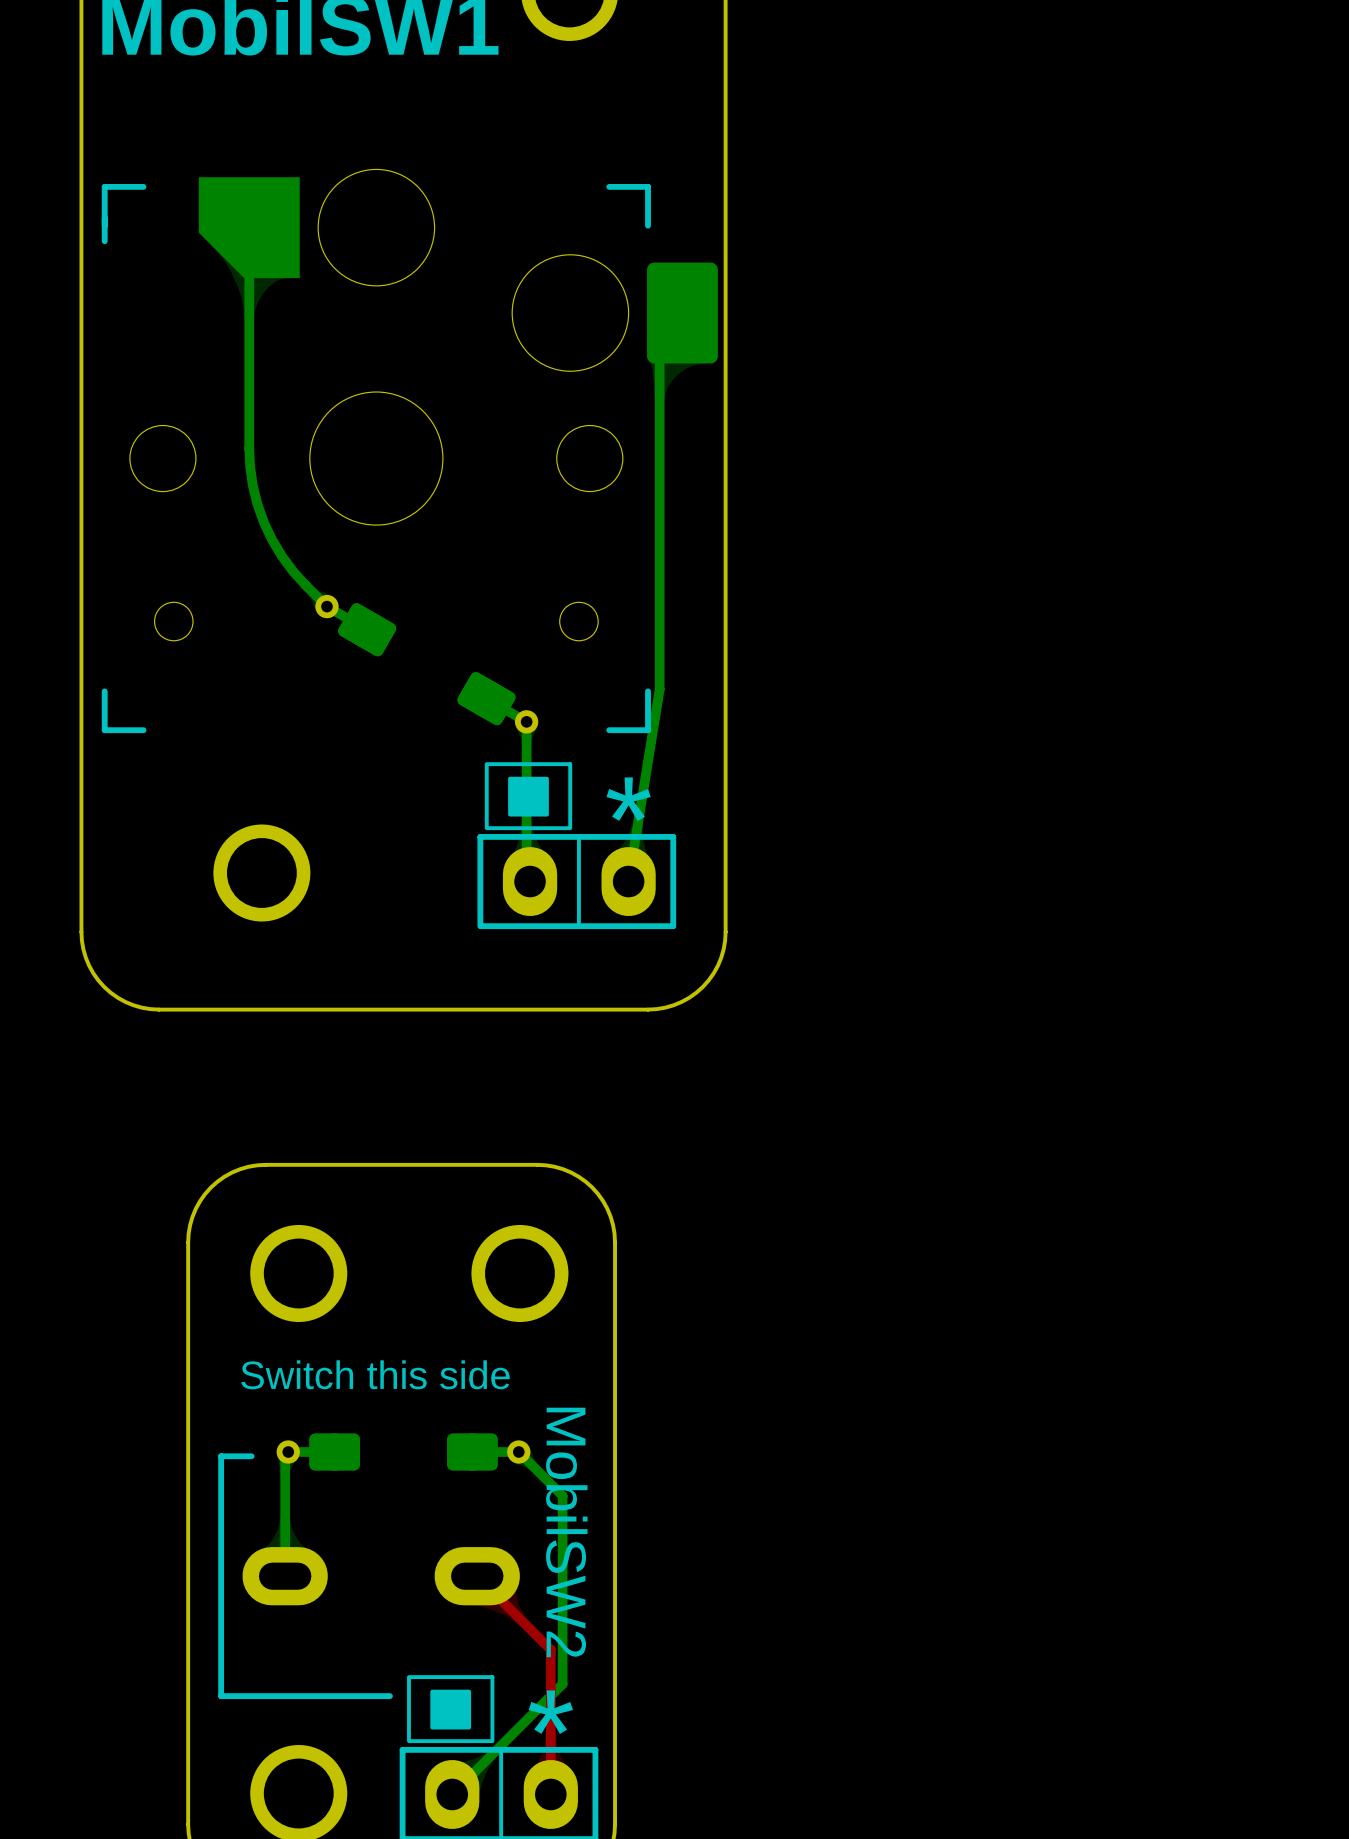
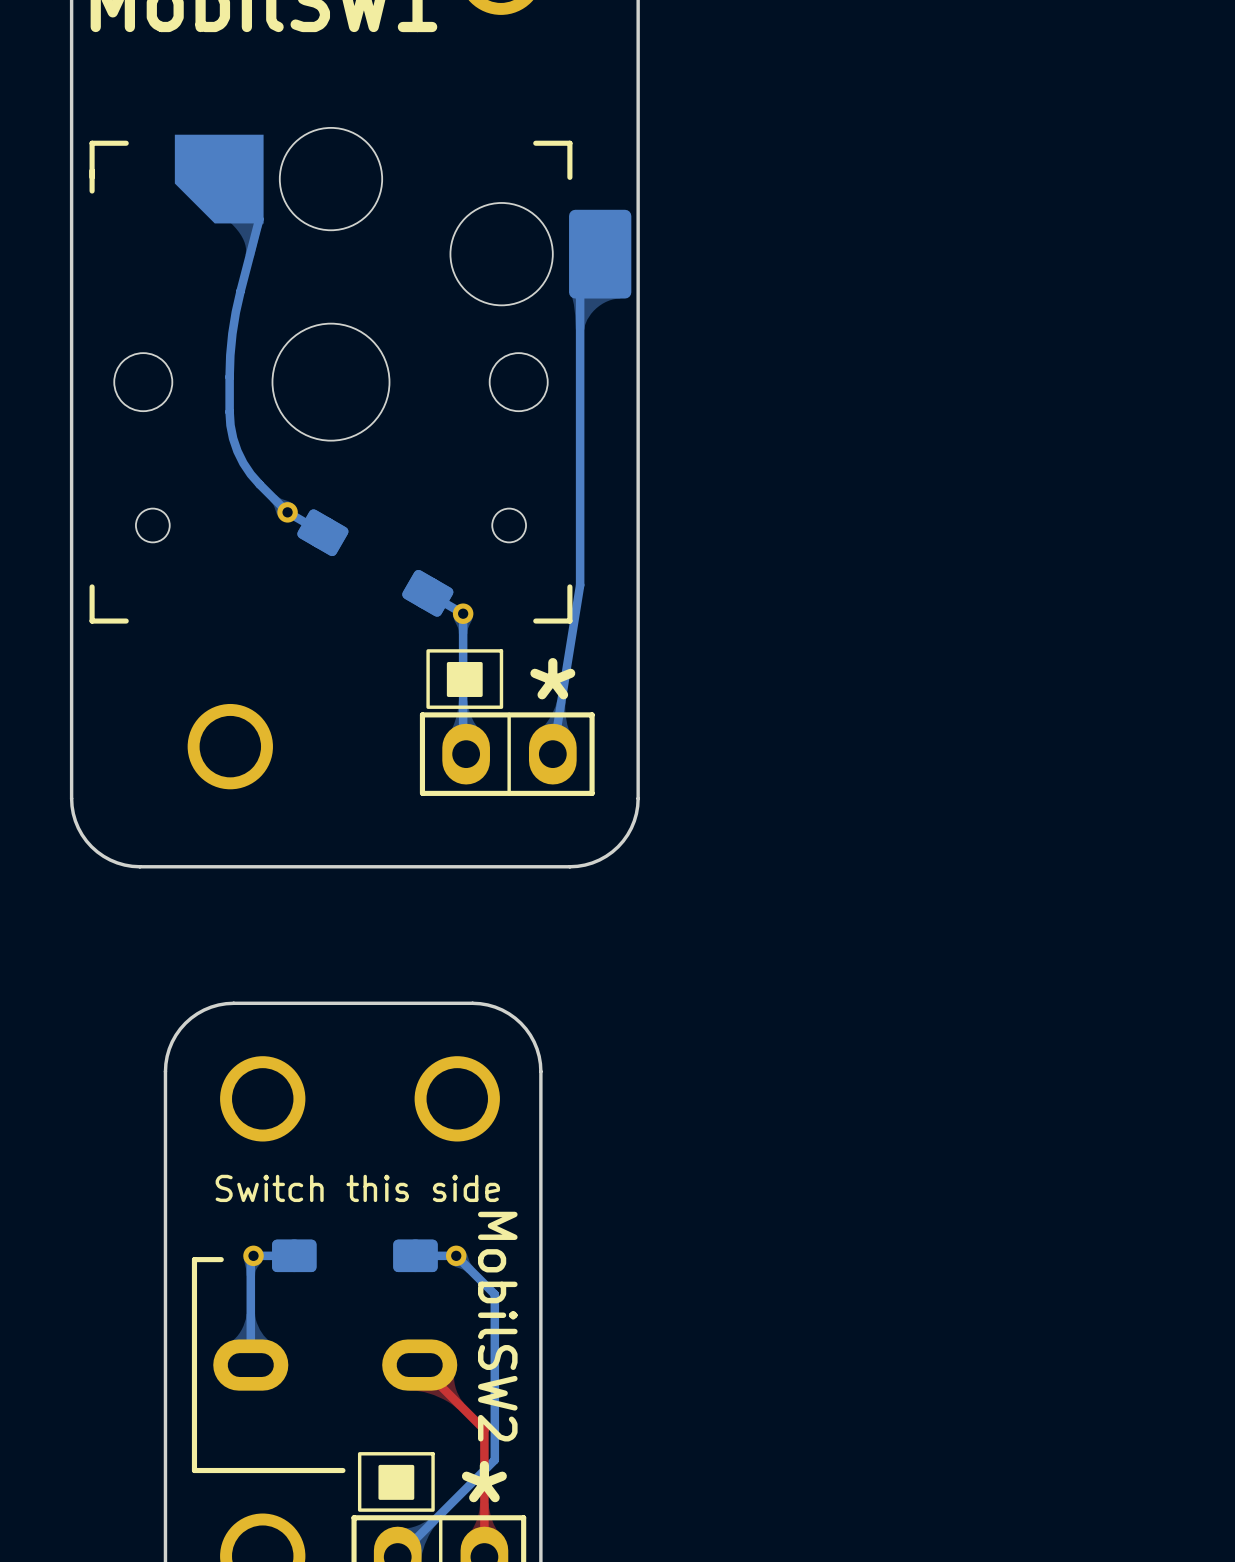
bottom track: (249, 227) (249, 448) (253, 486) (264, 522) (272, 539) (281, 556) (306, 585) -> (219, 179) (259, 219) (240, 291) (232, 333) (229, 411) (233, 438) (237, 451) (250, 474) (269, 493)

